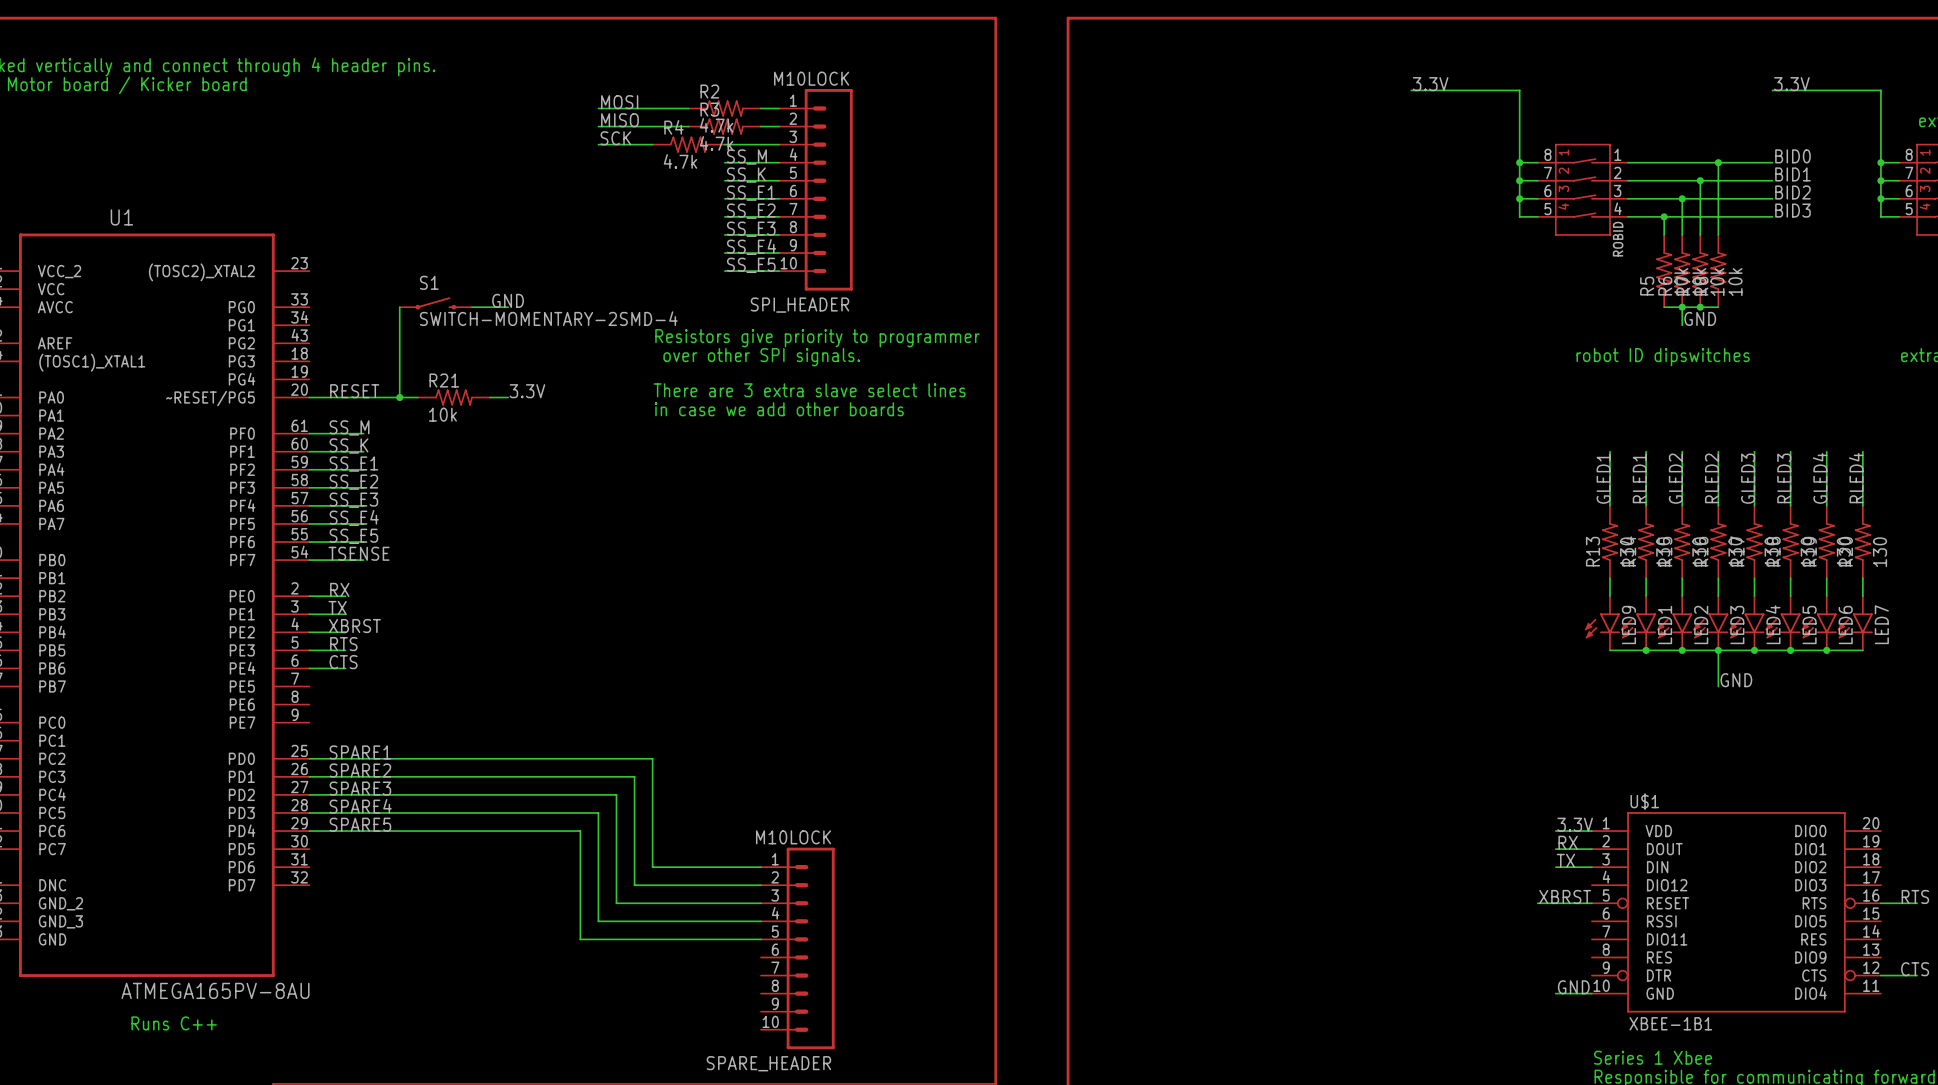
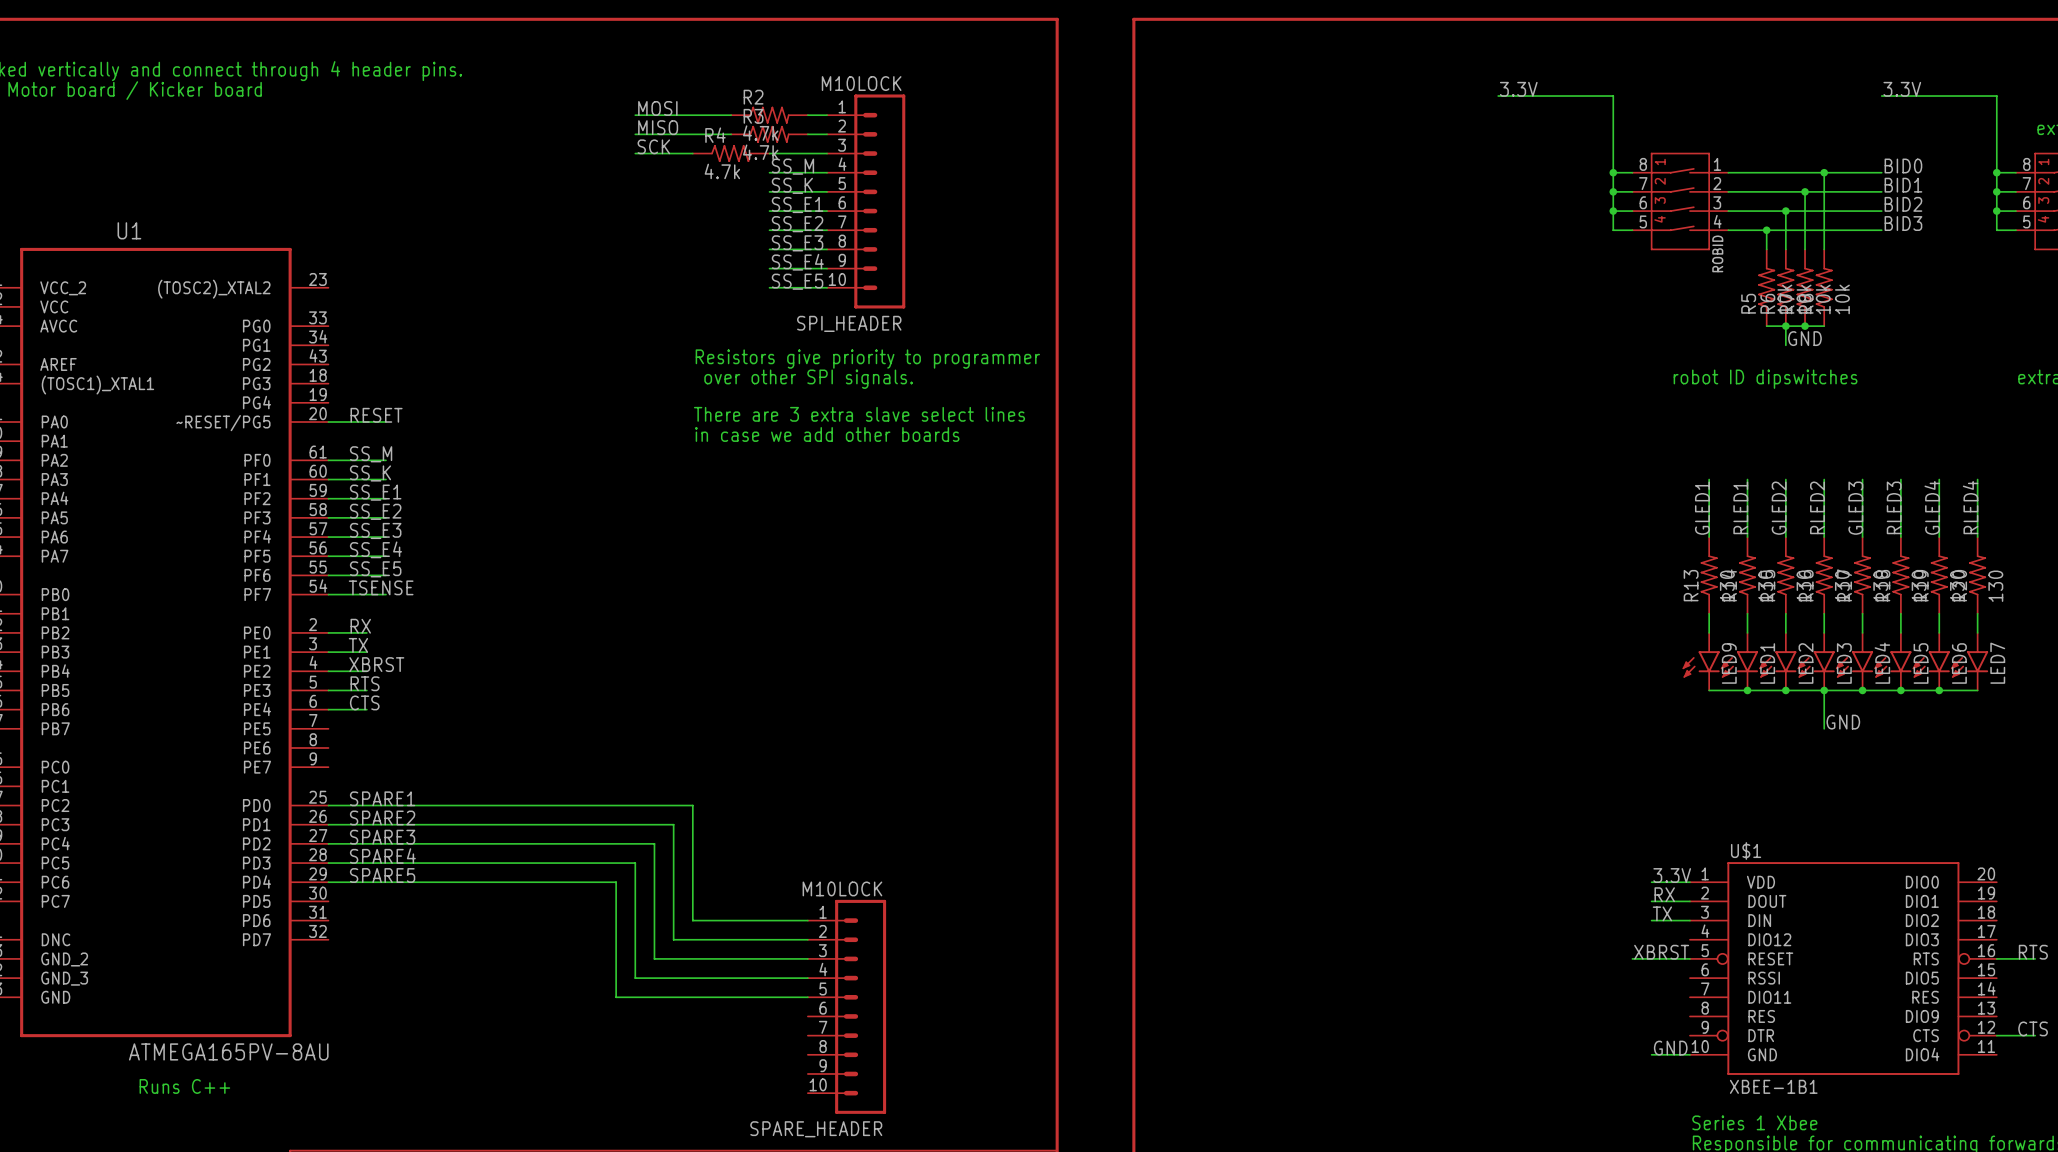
label: GND (508, 300) -> none
S1: SWITCH-MOMENTARY-2SMD-4 (435, 303) -> none
wire: (399, 307) (399, 397) -> none
wire: (471, 307) (508, 307) -> none
label: 3.3V (527, 391) -> none
wire: (363, 397) (417, 397) -> none
junction: (399, 397) -> none
R21: 10k (453, 397) -> none
wire: (490, 397) (508, 397) -> none

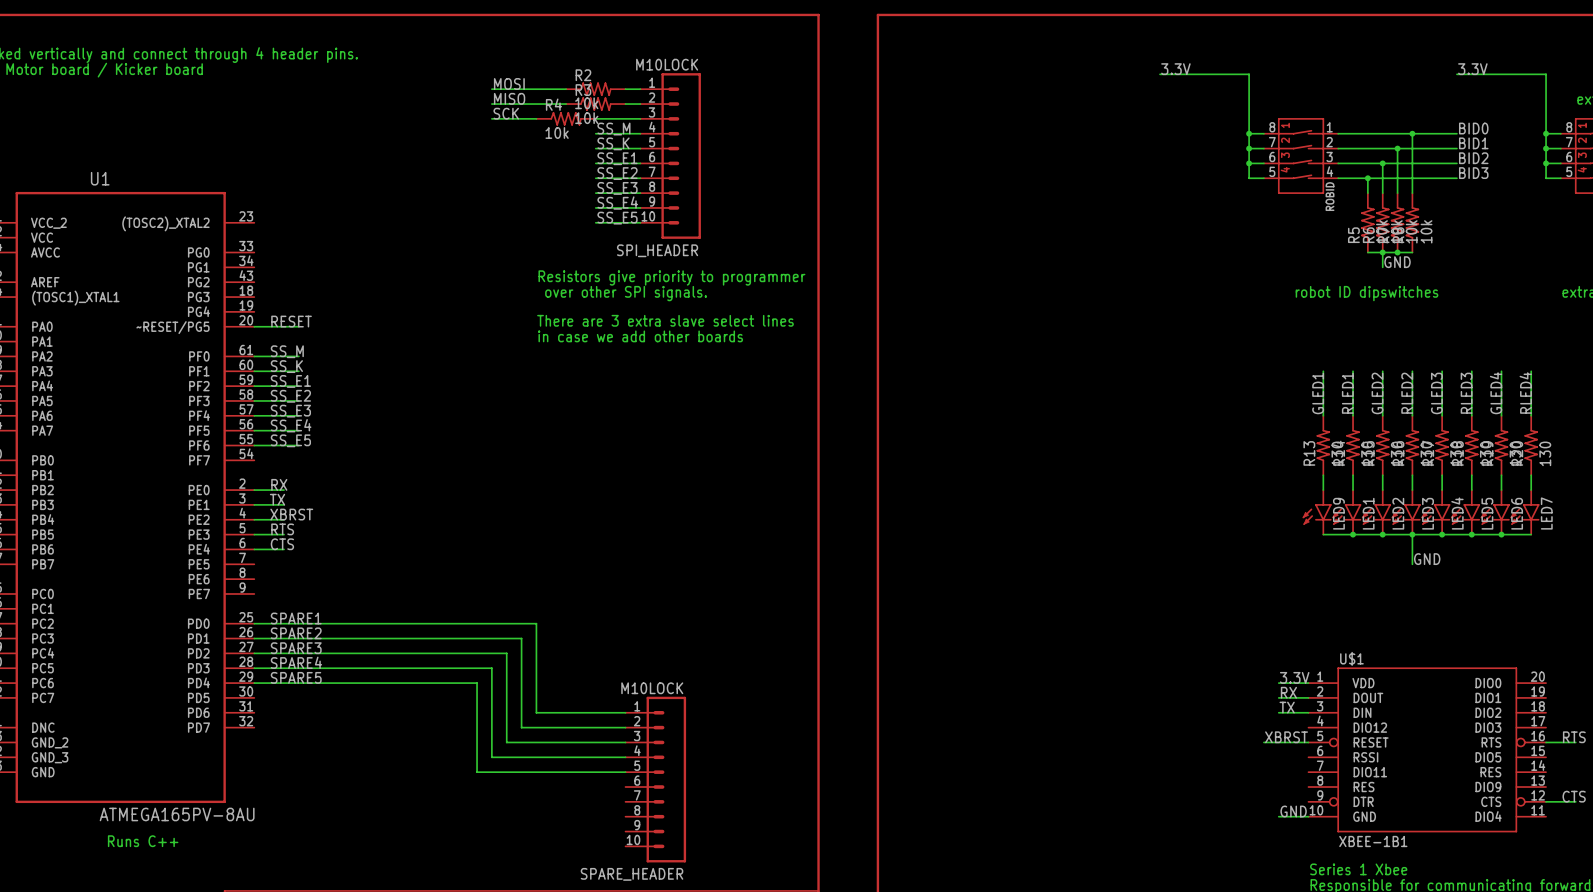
R2 value: 4.7k (760, 133) -> 10k (586, 103)
R3 value: 4.7k (760, 152) -> 10k (586, 118)
R4 value: 4.7k (722, 171) -> 10k (557, 132)
label: TSENSE (381, 587) -> none
wire: (328, 594) (386, 594) -> none

